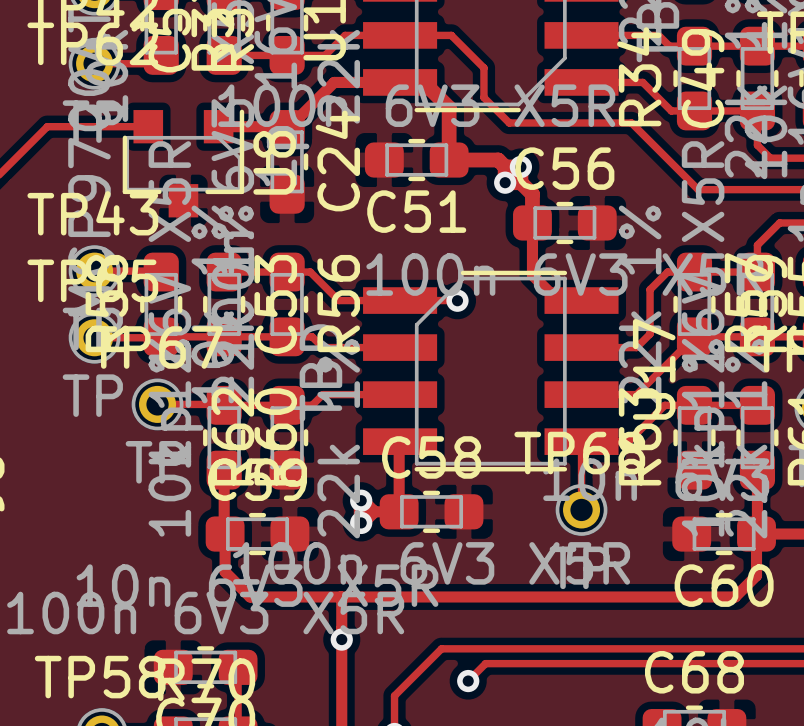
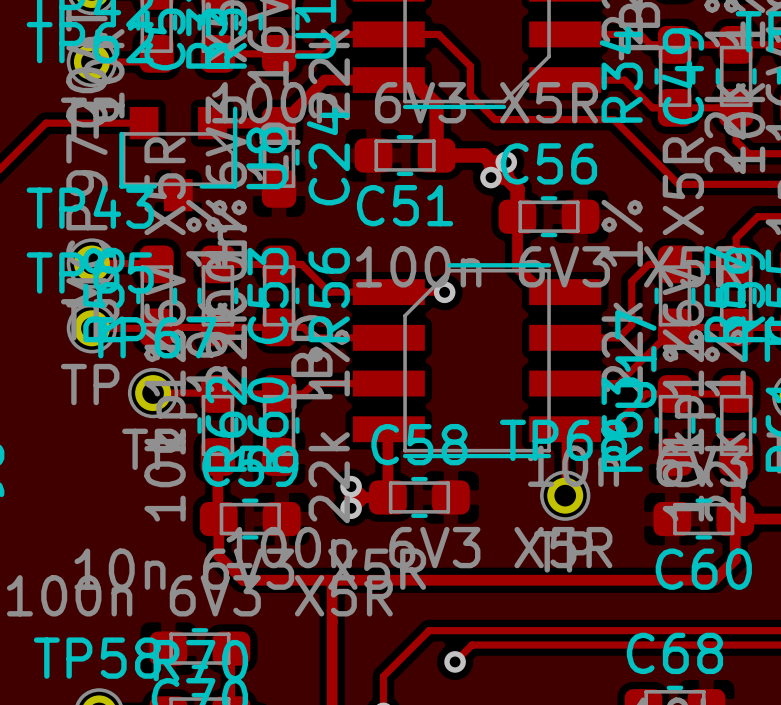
via: (341, 639) -> none

